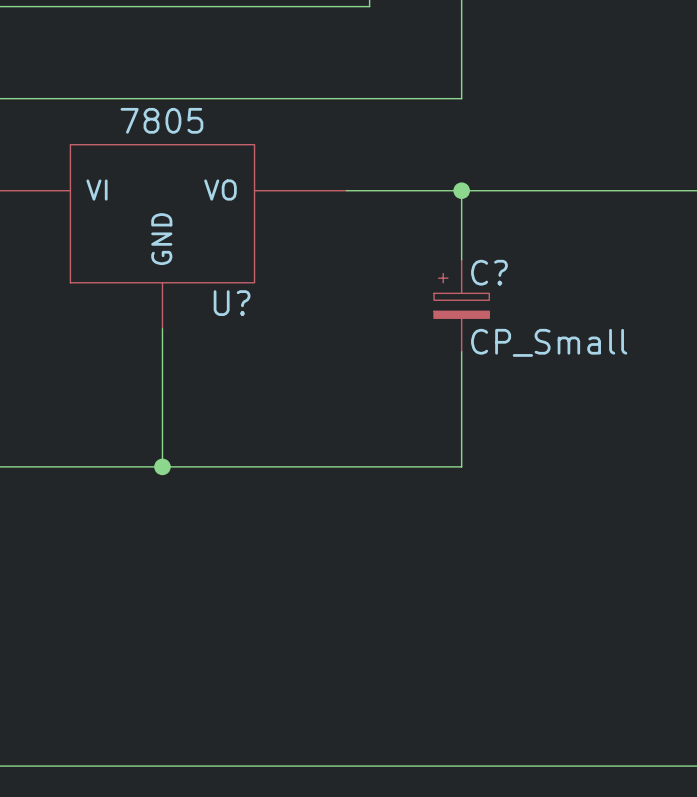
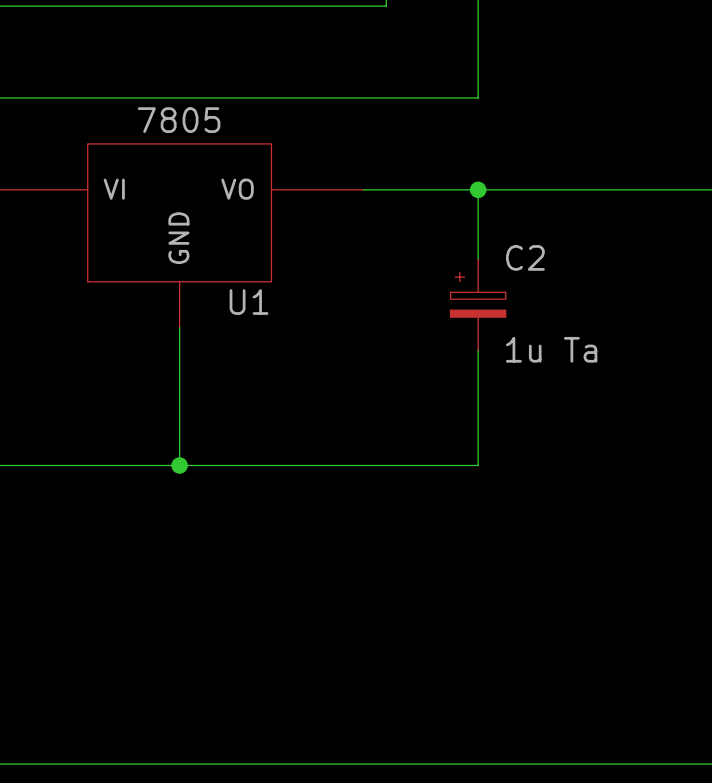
C? name: C? (489, 272) -> C2 (525, 257)
U? name: U? (232, 303) -> U1 (249, 302)
C? value: CP_Small (549, 342) -> 1u Ta (551, 349)

